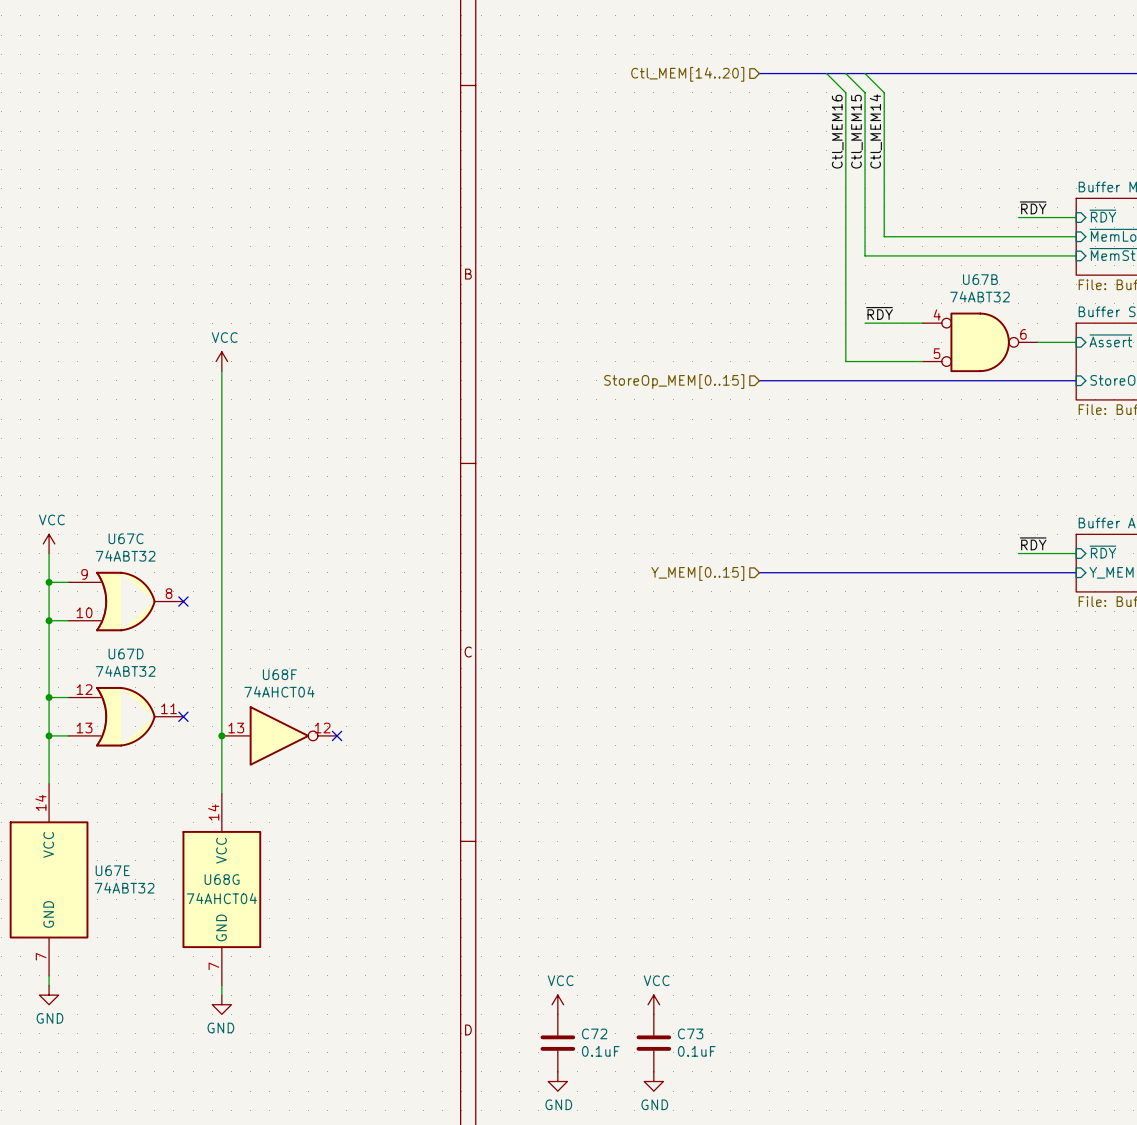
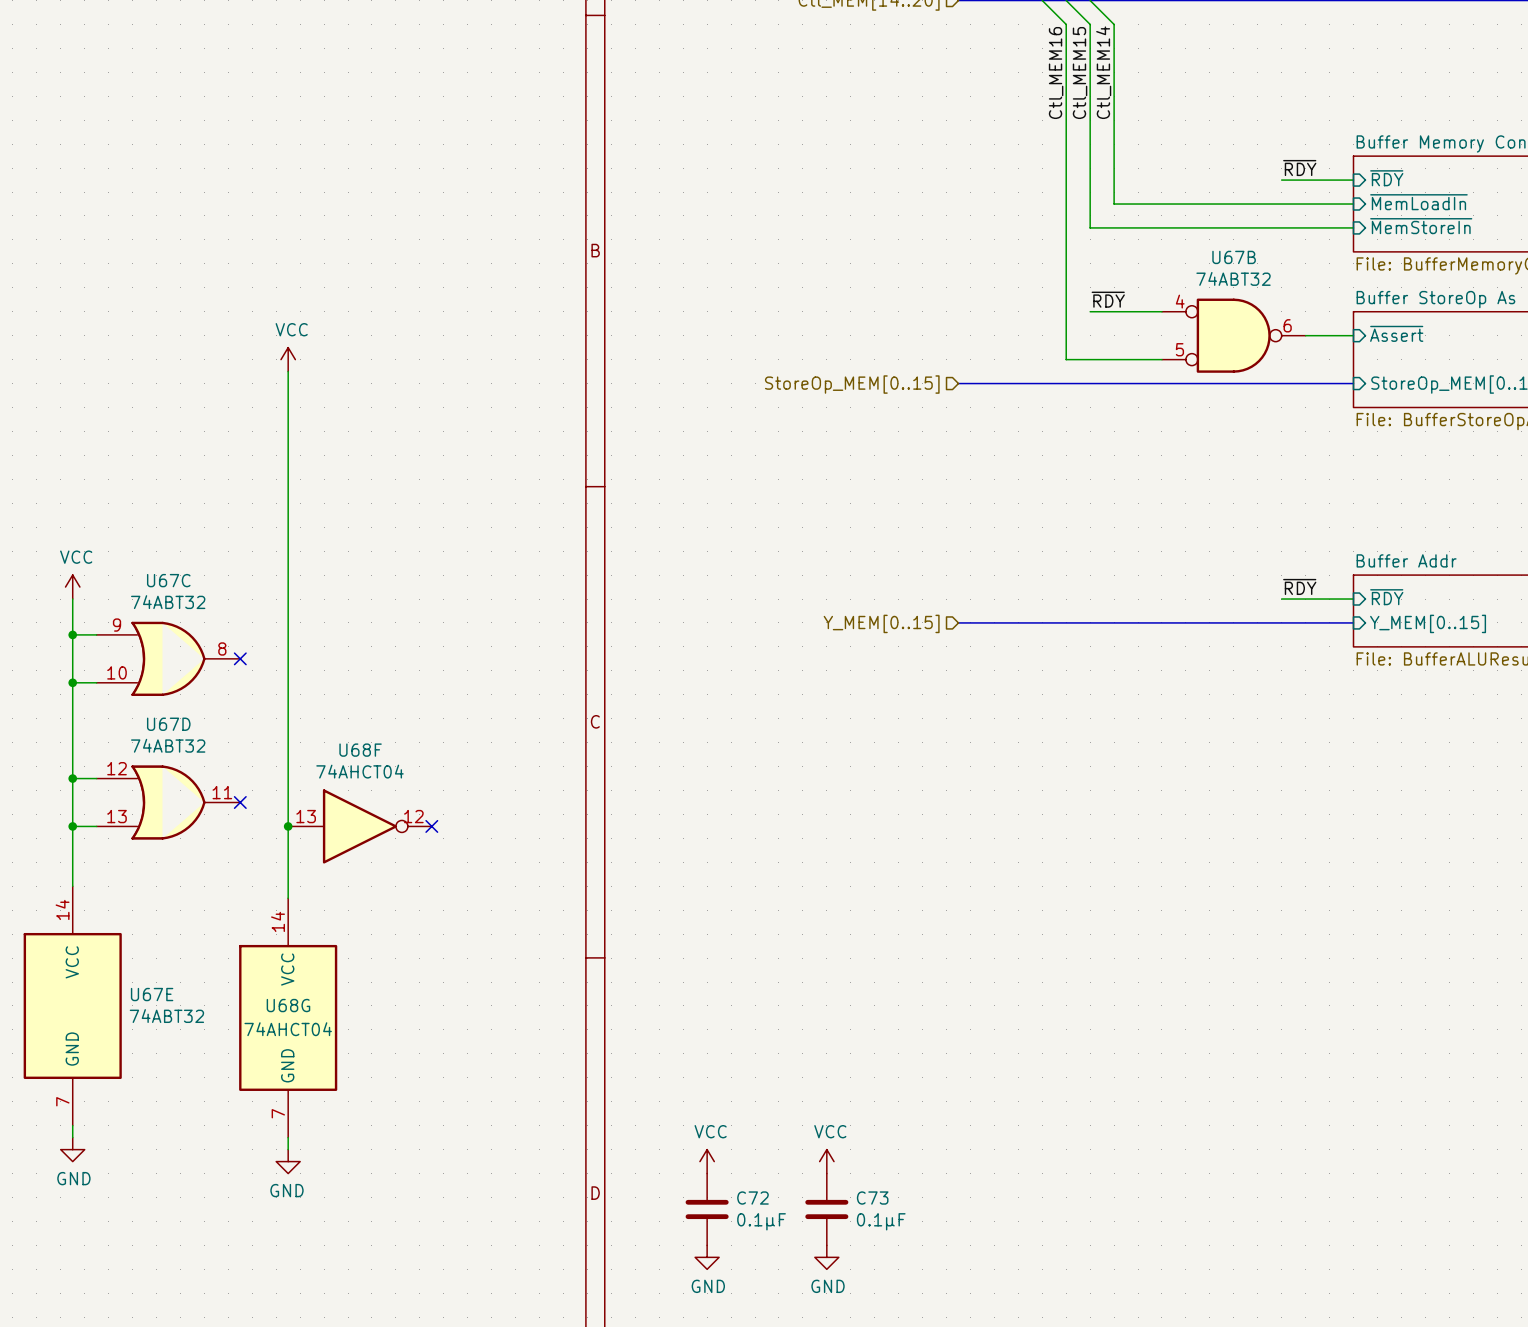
C72 value: 0.1uF (600, 1051) -> 0.1μF (761, 1221)
C73 value: 0.1uF (696, 1051) -> 0.1μF (881, 1221)

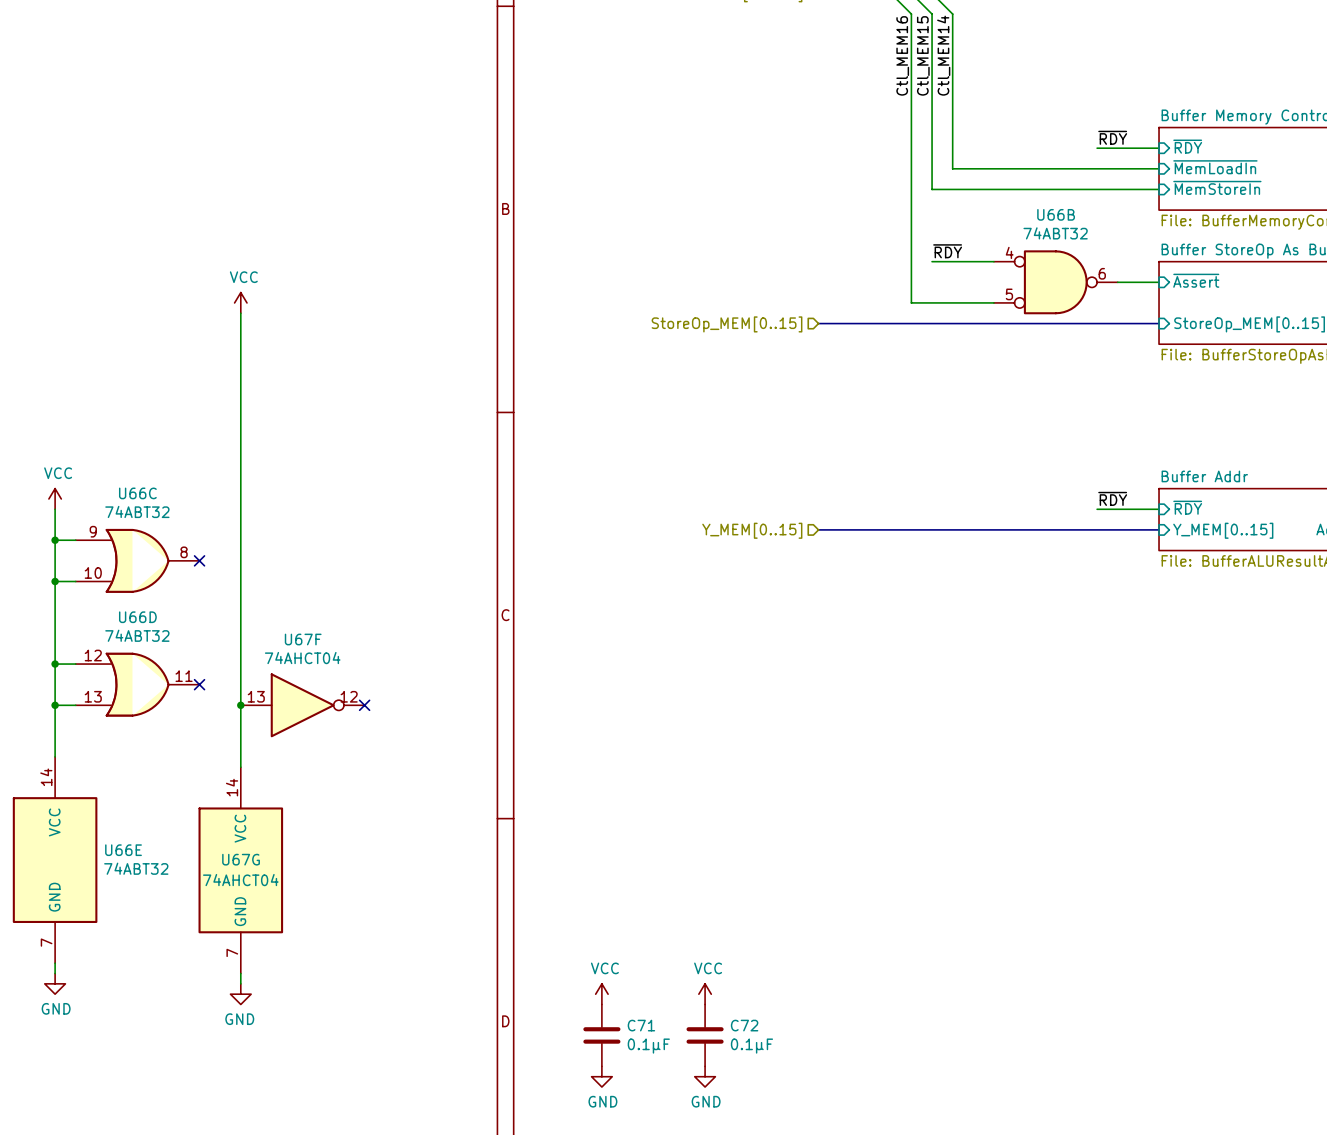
U67B name: U67B (1234, 257) -> U66B (1056, 214)
U67C name: U67C (168, 580) -> U66C (137, 493)
U67D name: U67D (168, 724) -> U66D (137, 617)
U68F name: U68F (360, 750) -> U67F (303, 639)
U67E name: U67E (152, 994) -> U66E (123, 850)
U68G name: U68G (288, 1005) -> U67G (241, 859)
C72 name: C72 (752, 1198) -> C71 (641, 1025)
C73 name: C73 (872, 1198) -> C72 (744, 1025)

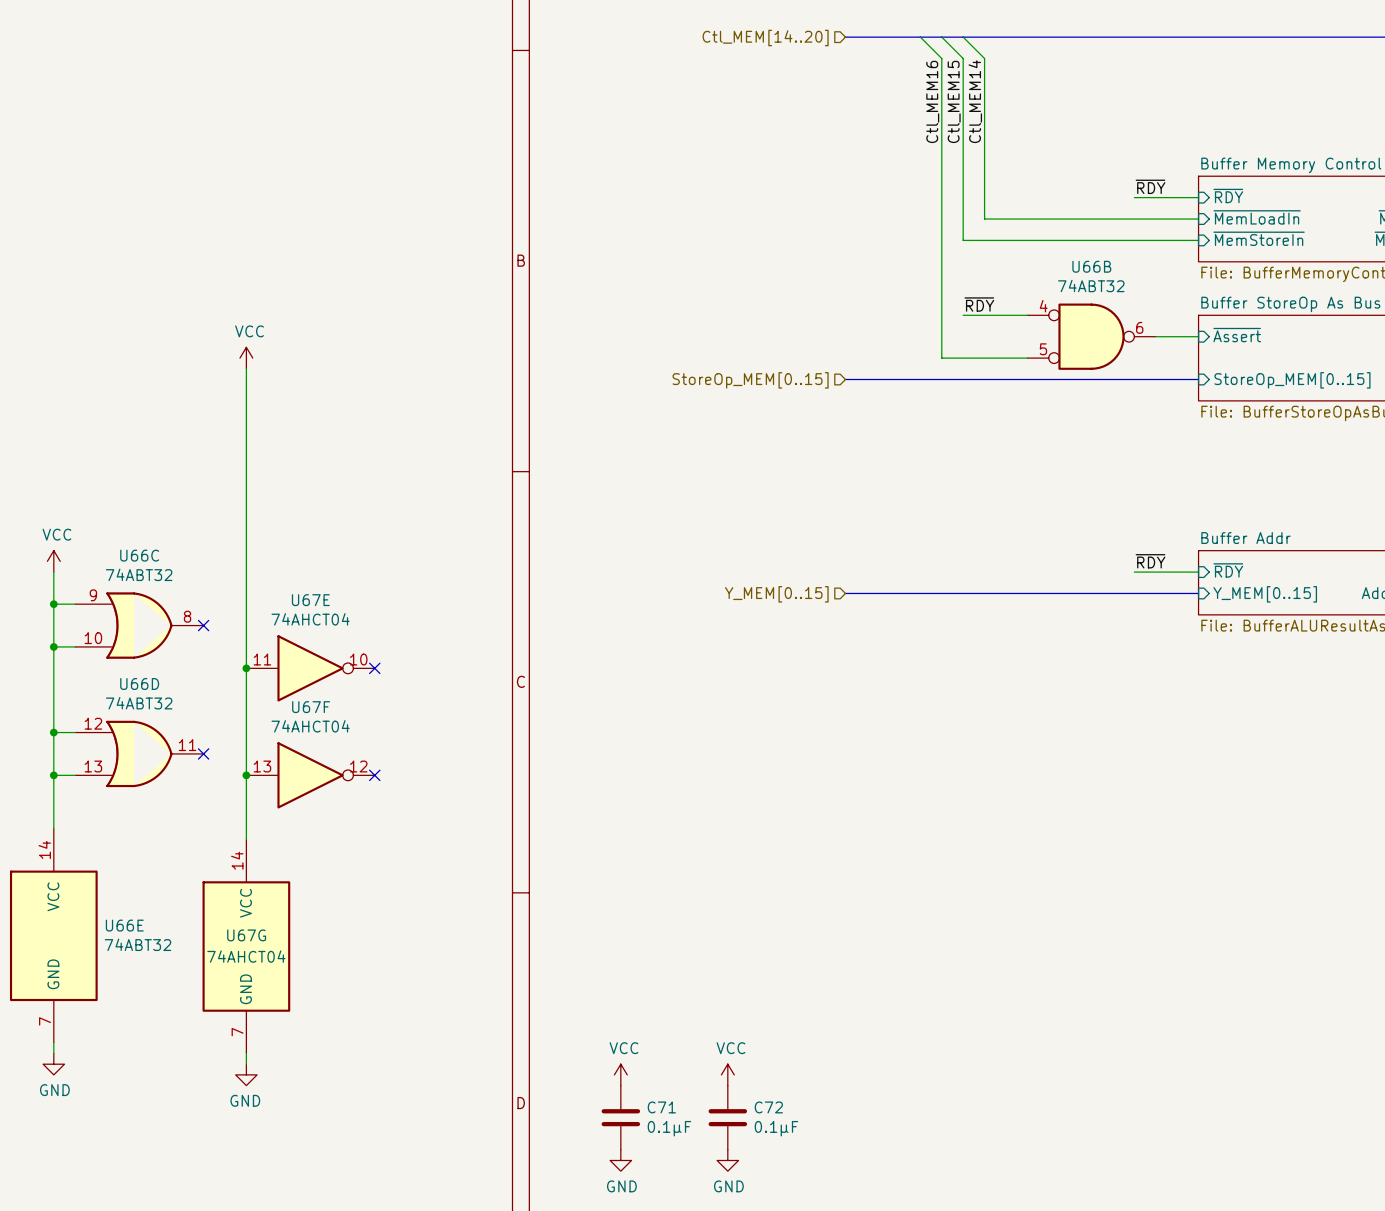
junction: none -> (246, 668)
U67E: none -> 74AHCT04 (310, 668)
no-connect mark: none -> (374, 668)

